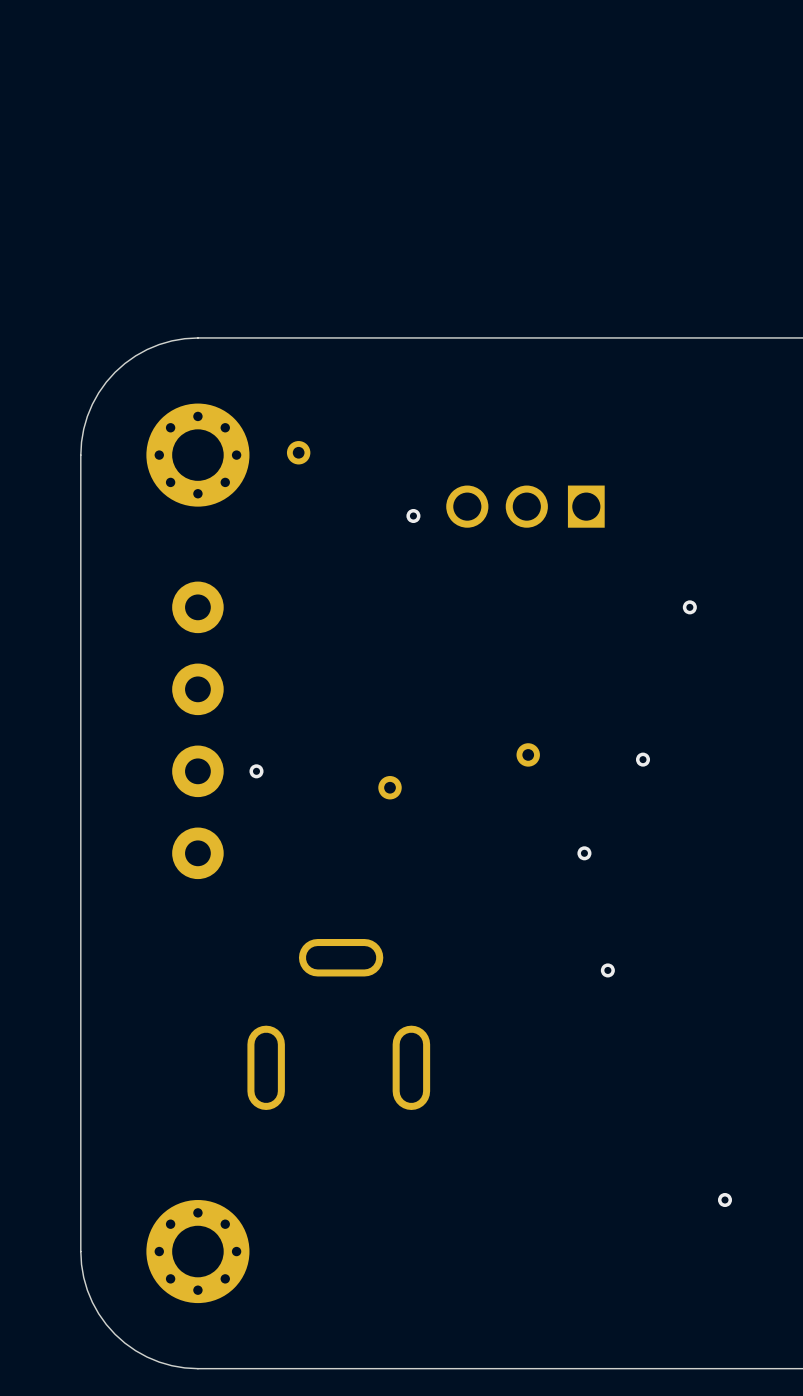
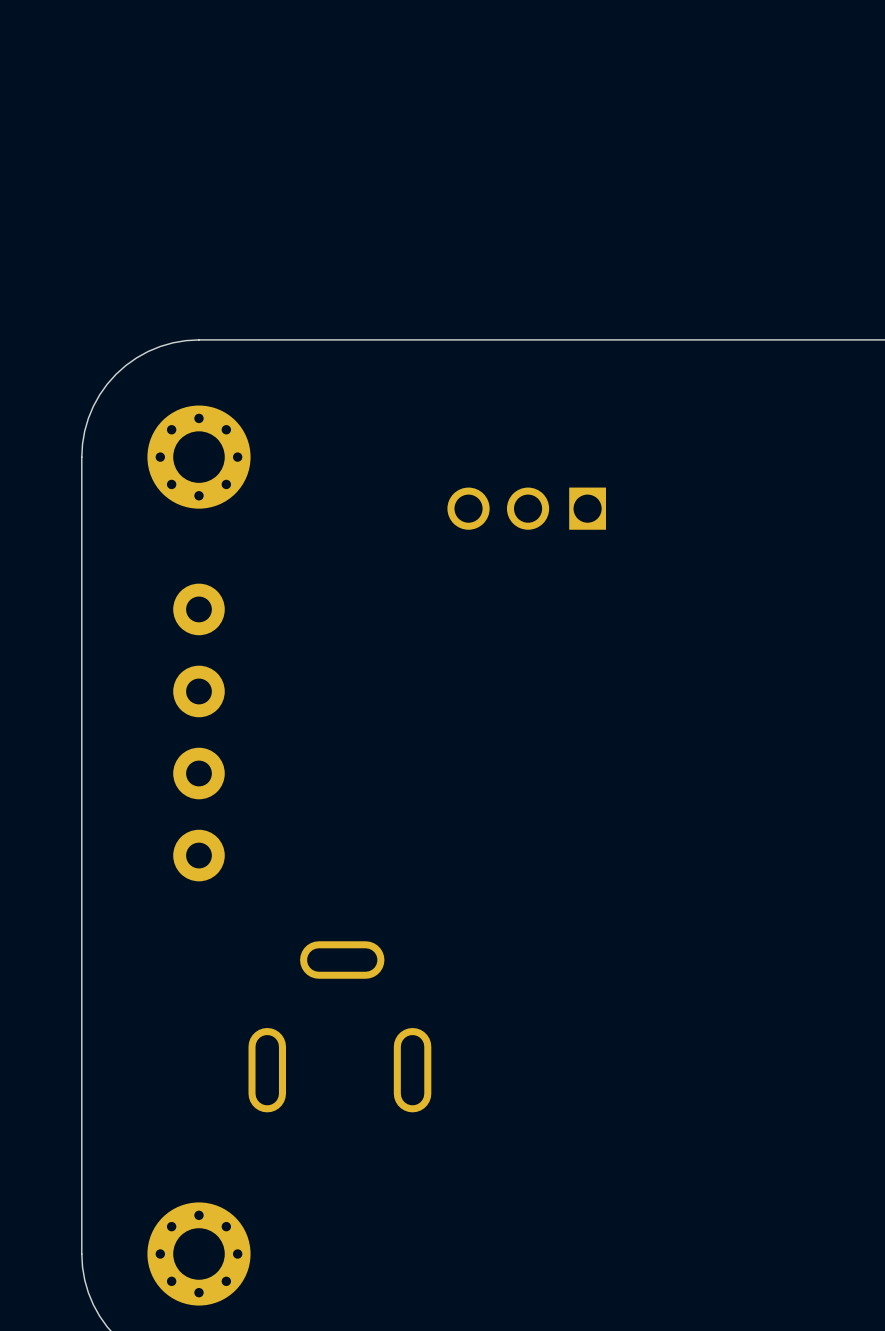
part: (298, 452) -> none
via: (413, 515) -> none
via: (689, 607) -> none
part: (528, 754) -> none
via: (643, 759) -> none
via: (256, 771) -> none
part: (390, 787) -> none
via: (584, 853) -> none
via: (607, 970) -> none
via: (724, 1200) -> none

